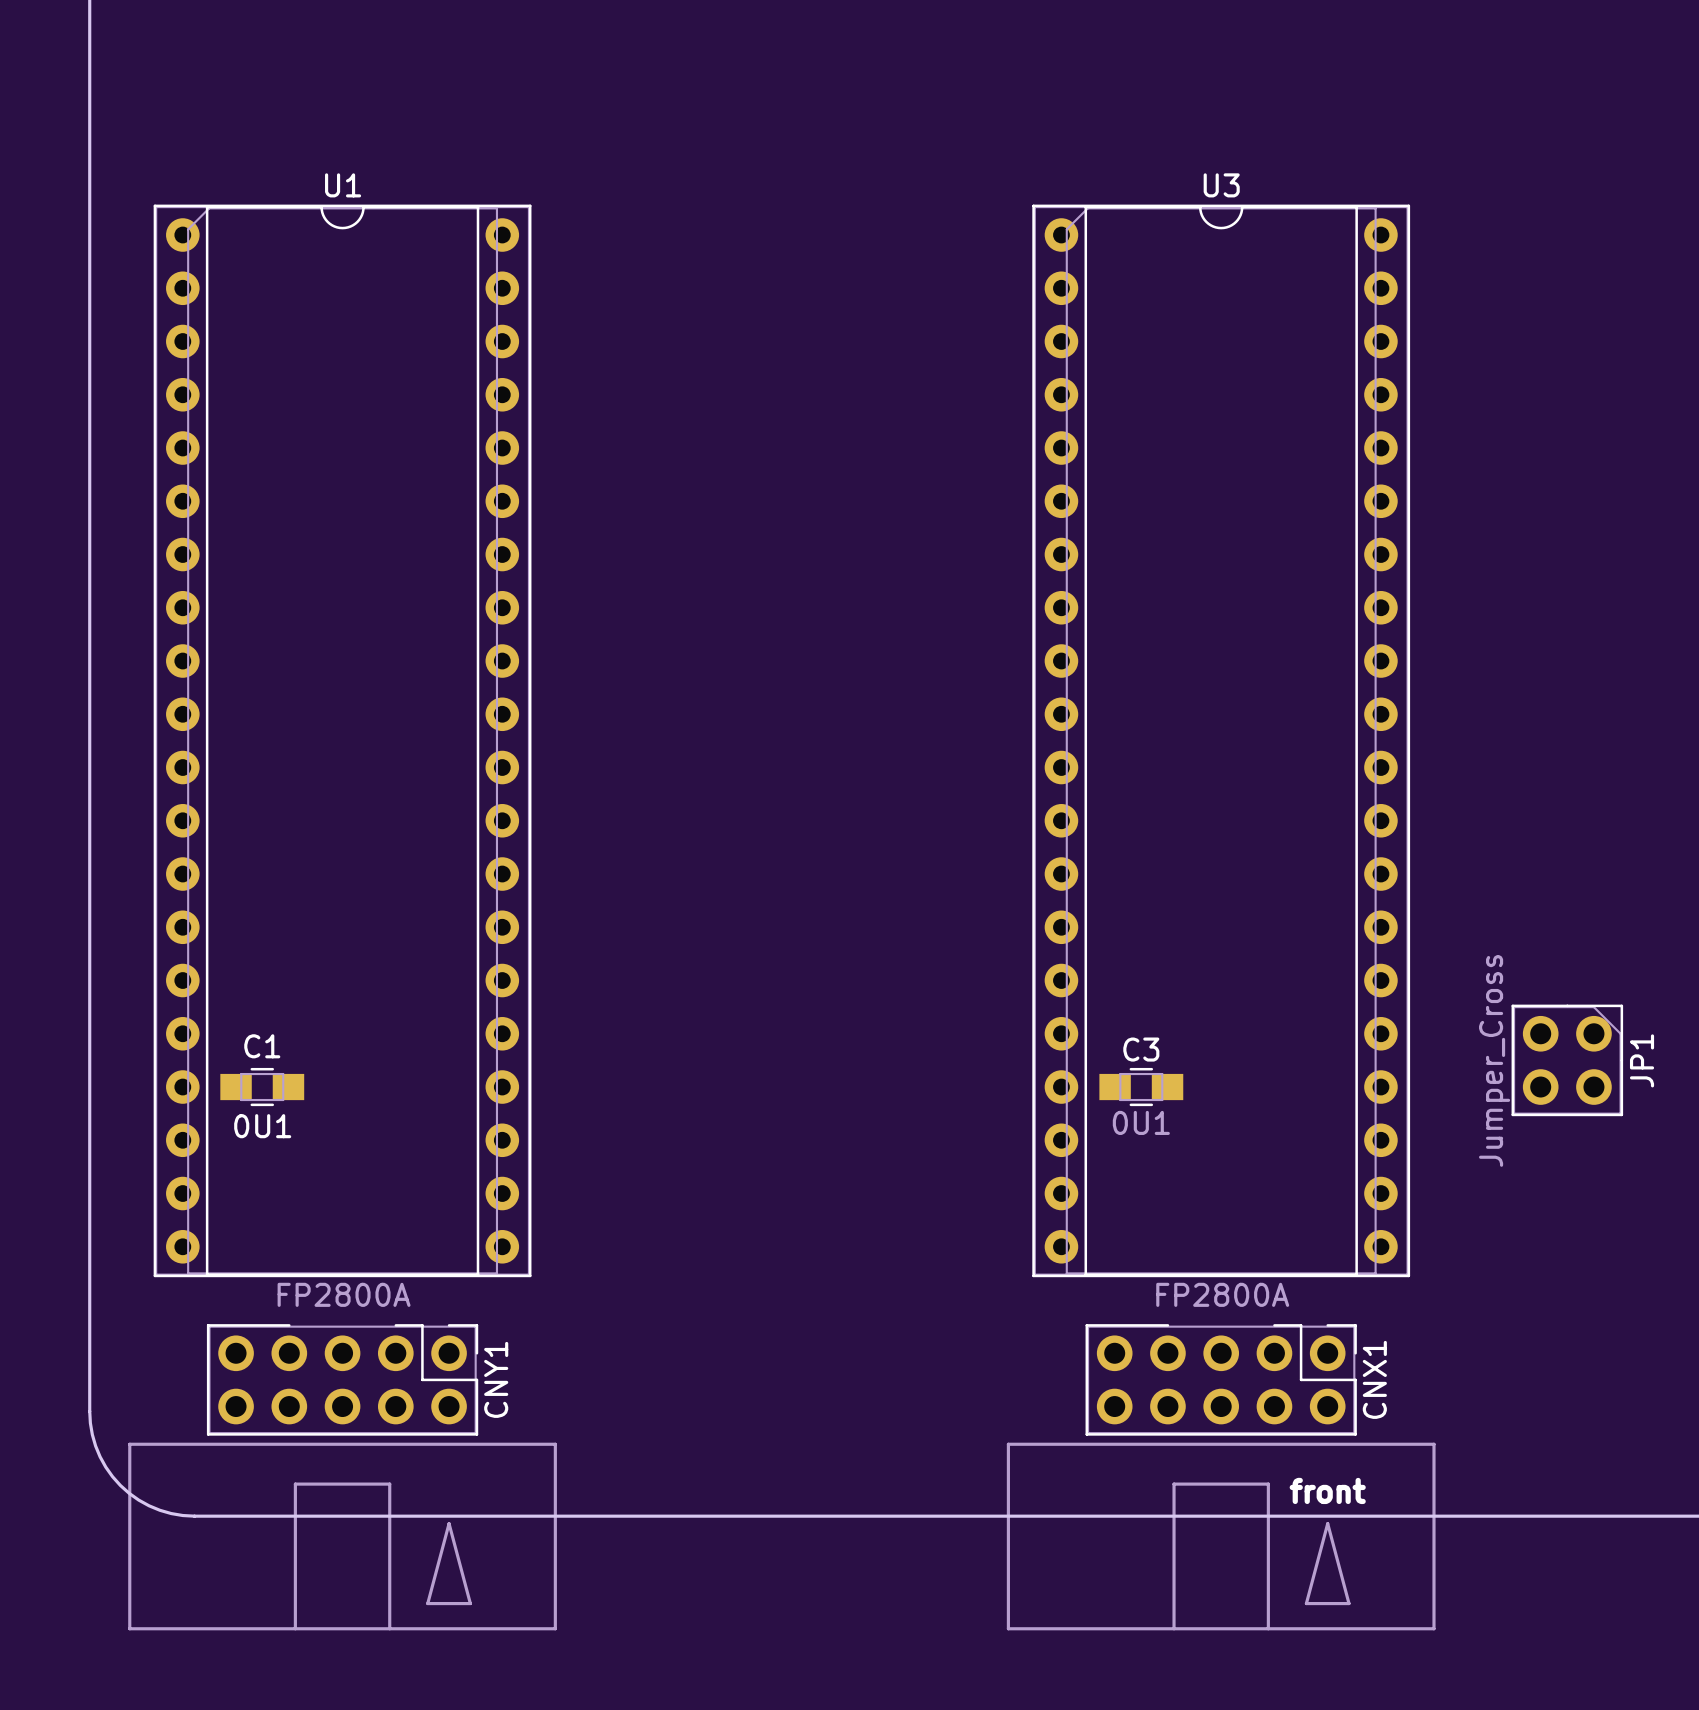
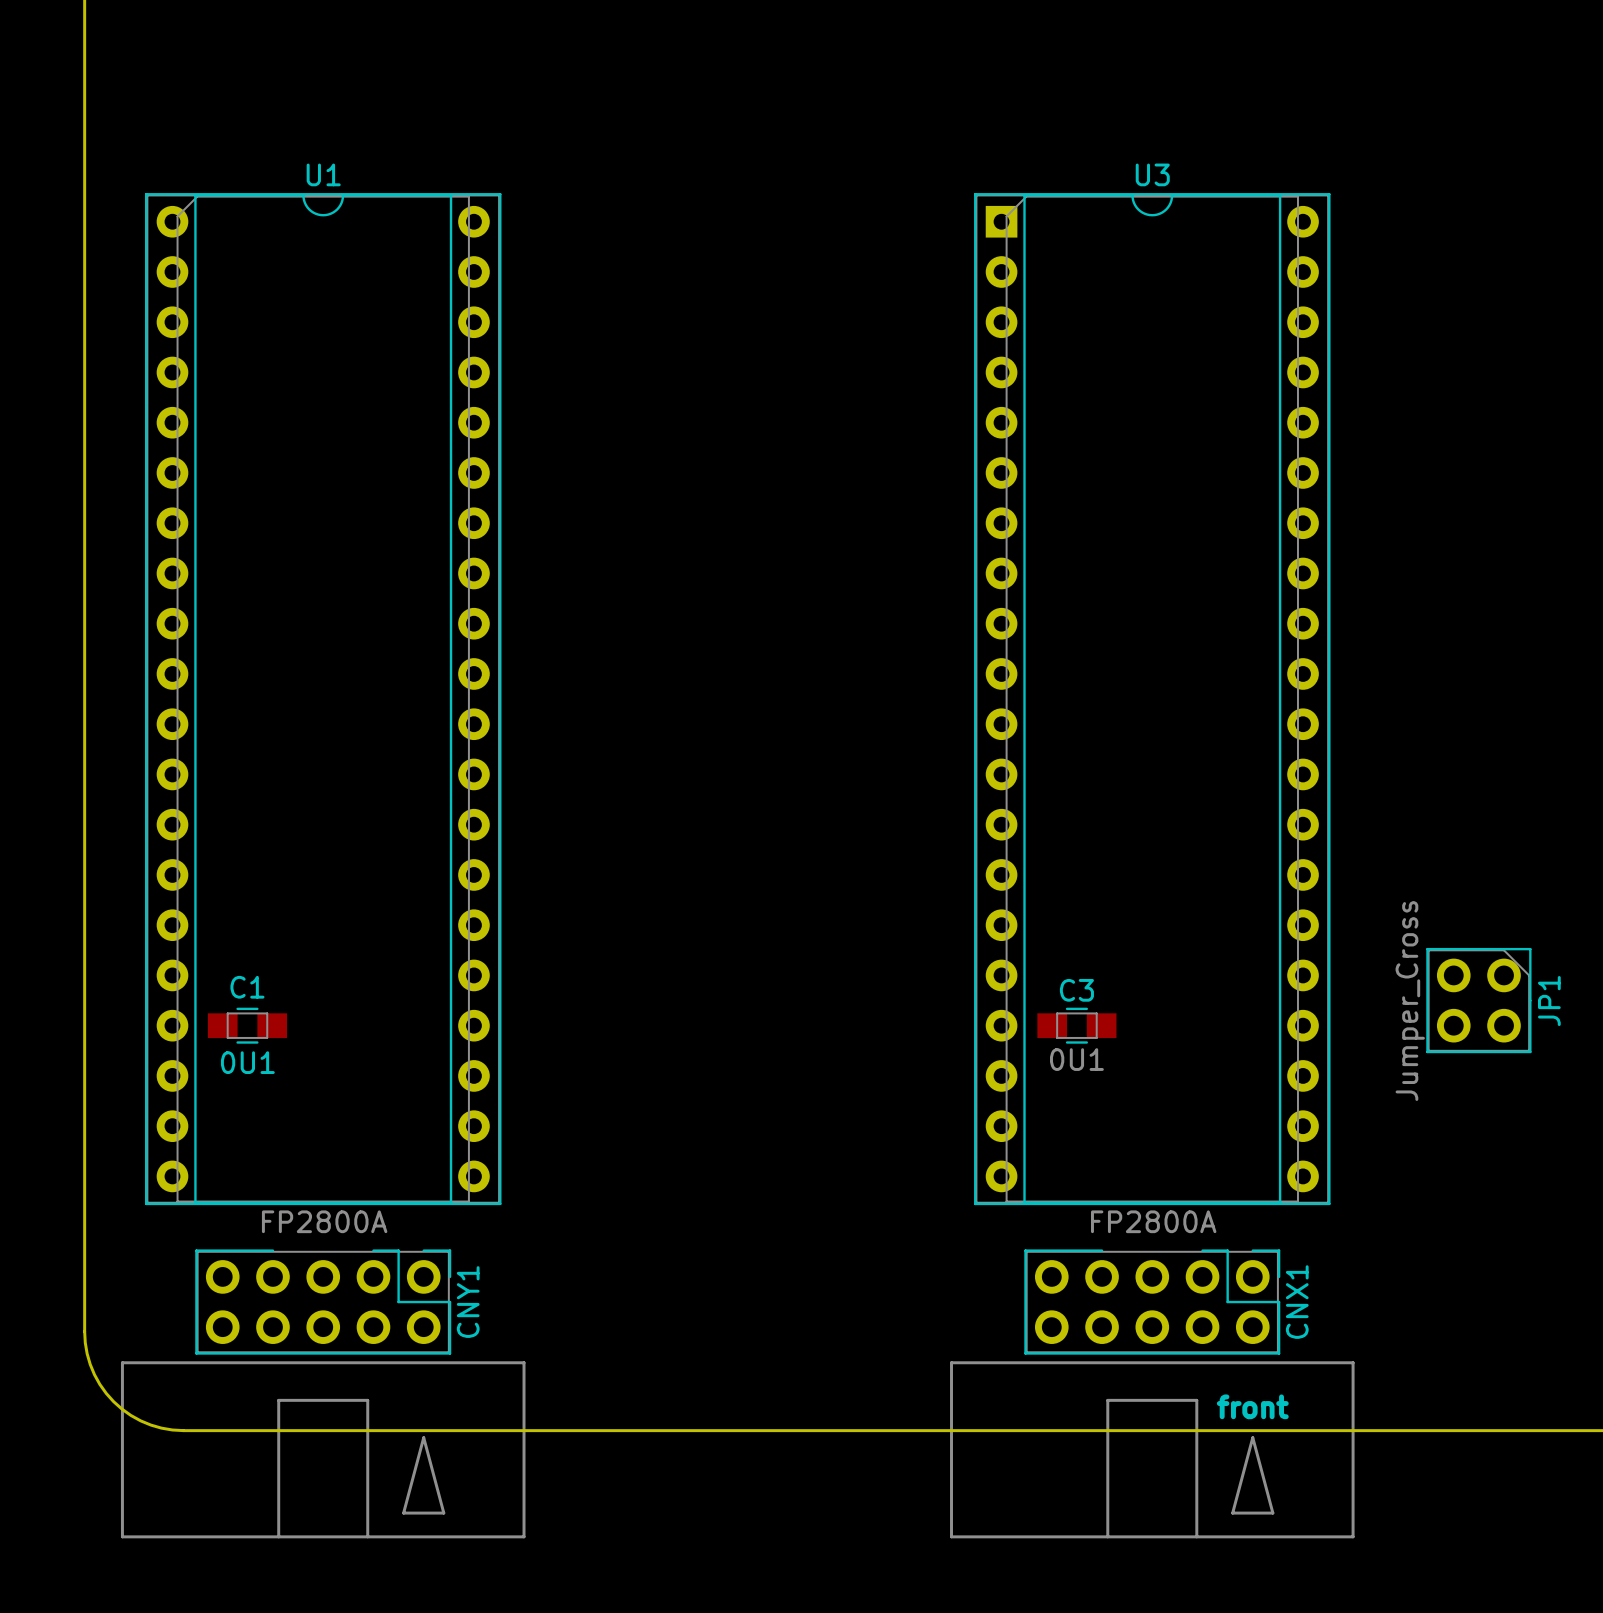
U3 footprint: [1032, 204, 1411, 1278] -> [974, 193, 1331, 1206]

